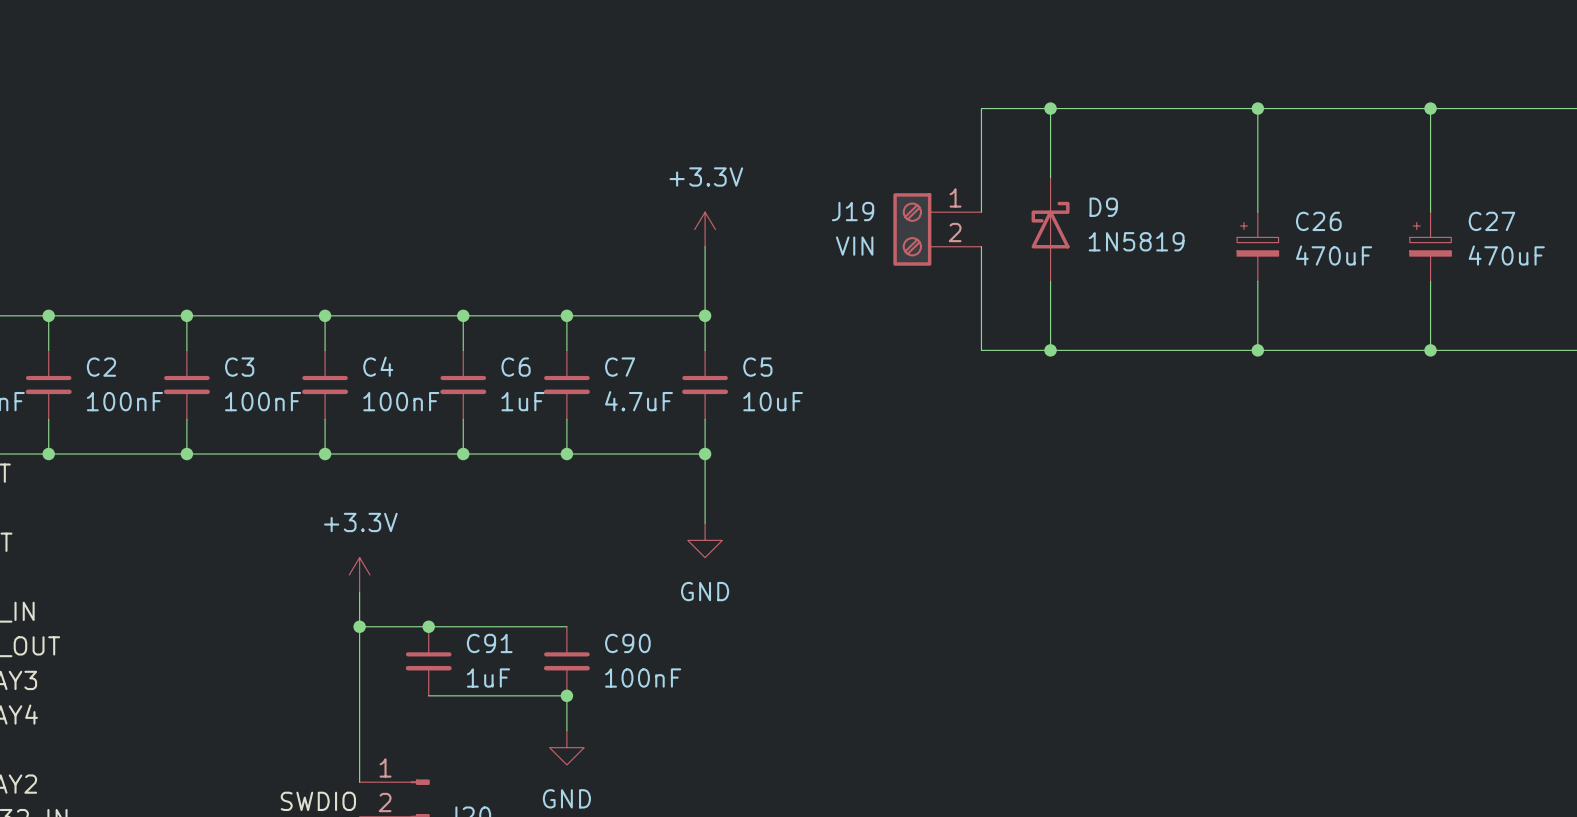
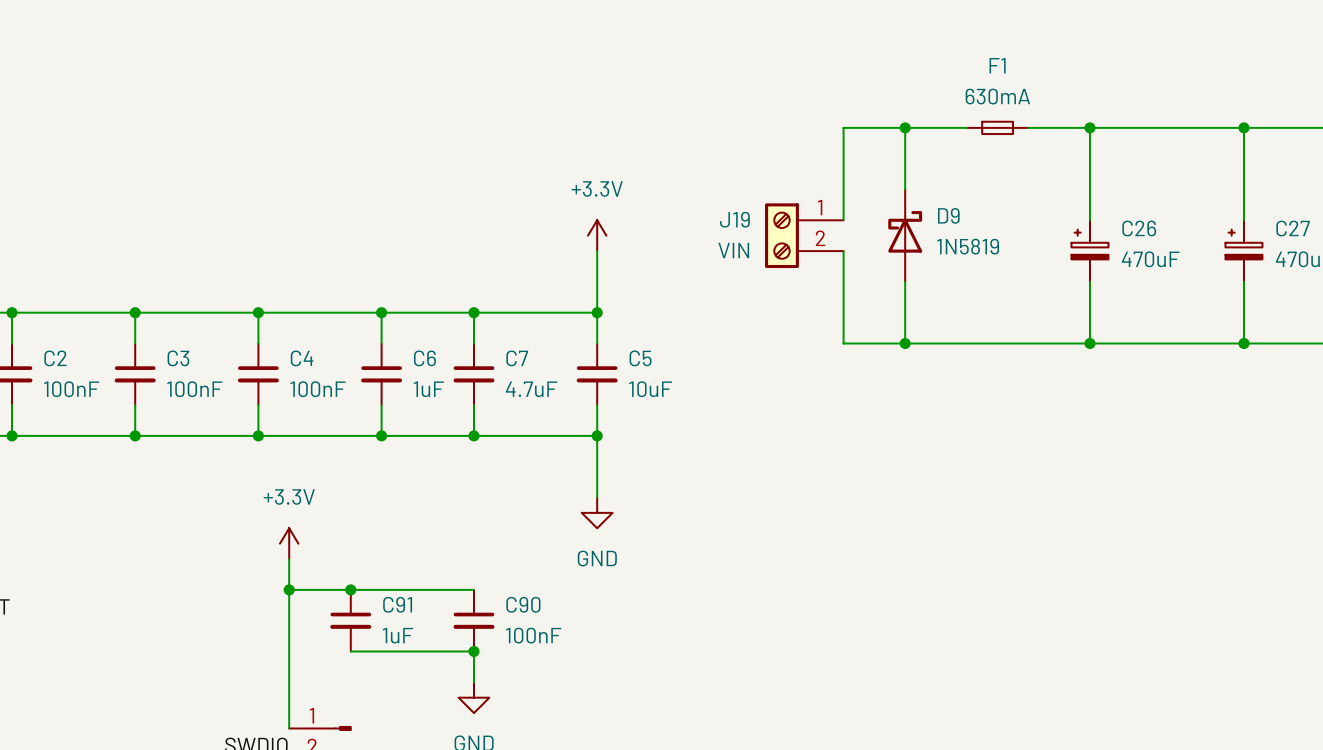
F1: none -> 630mA (997, 127)

